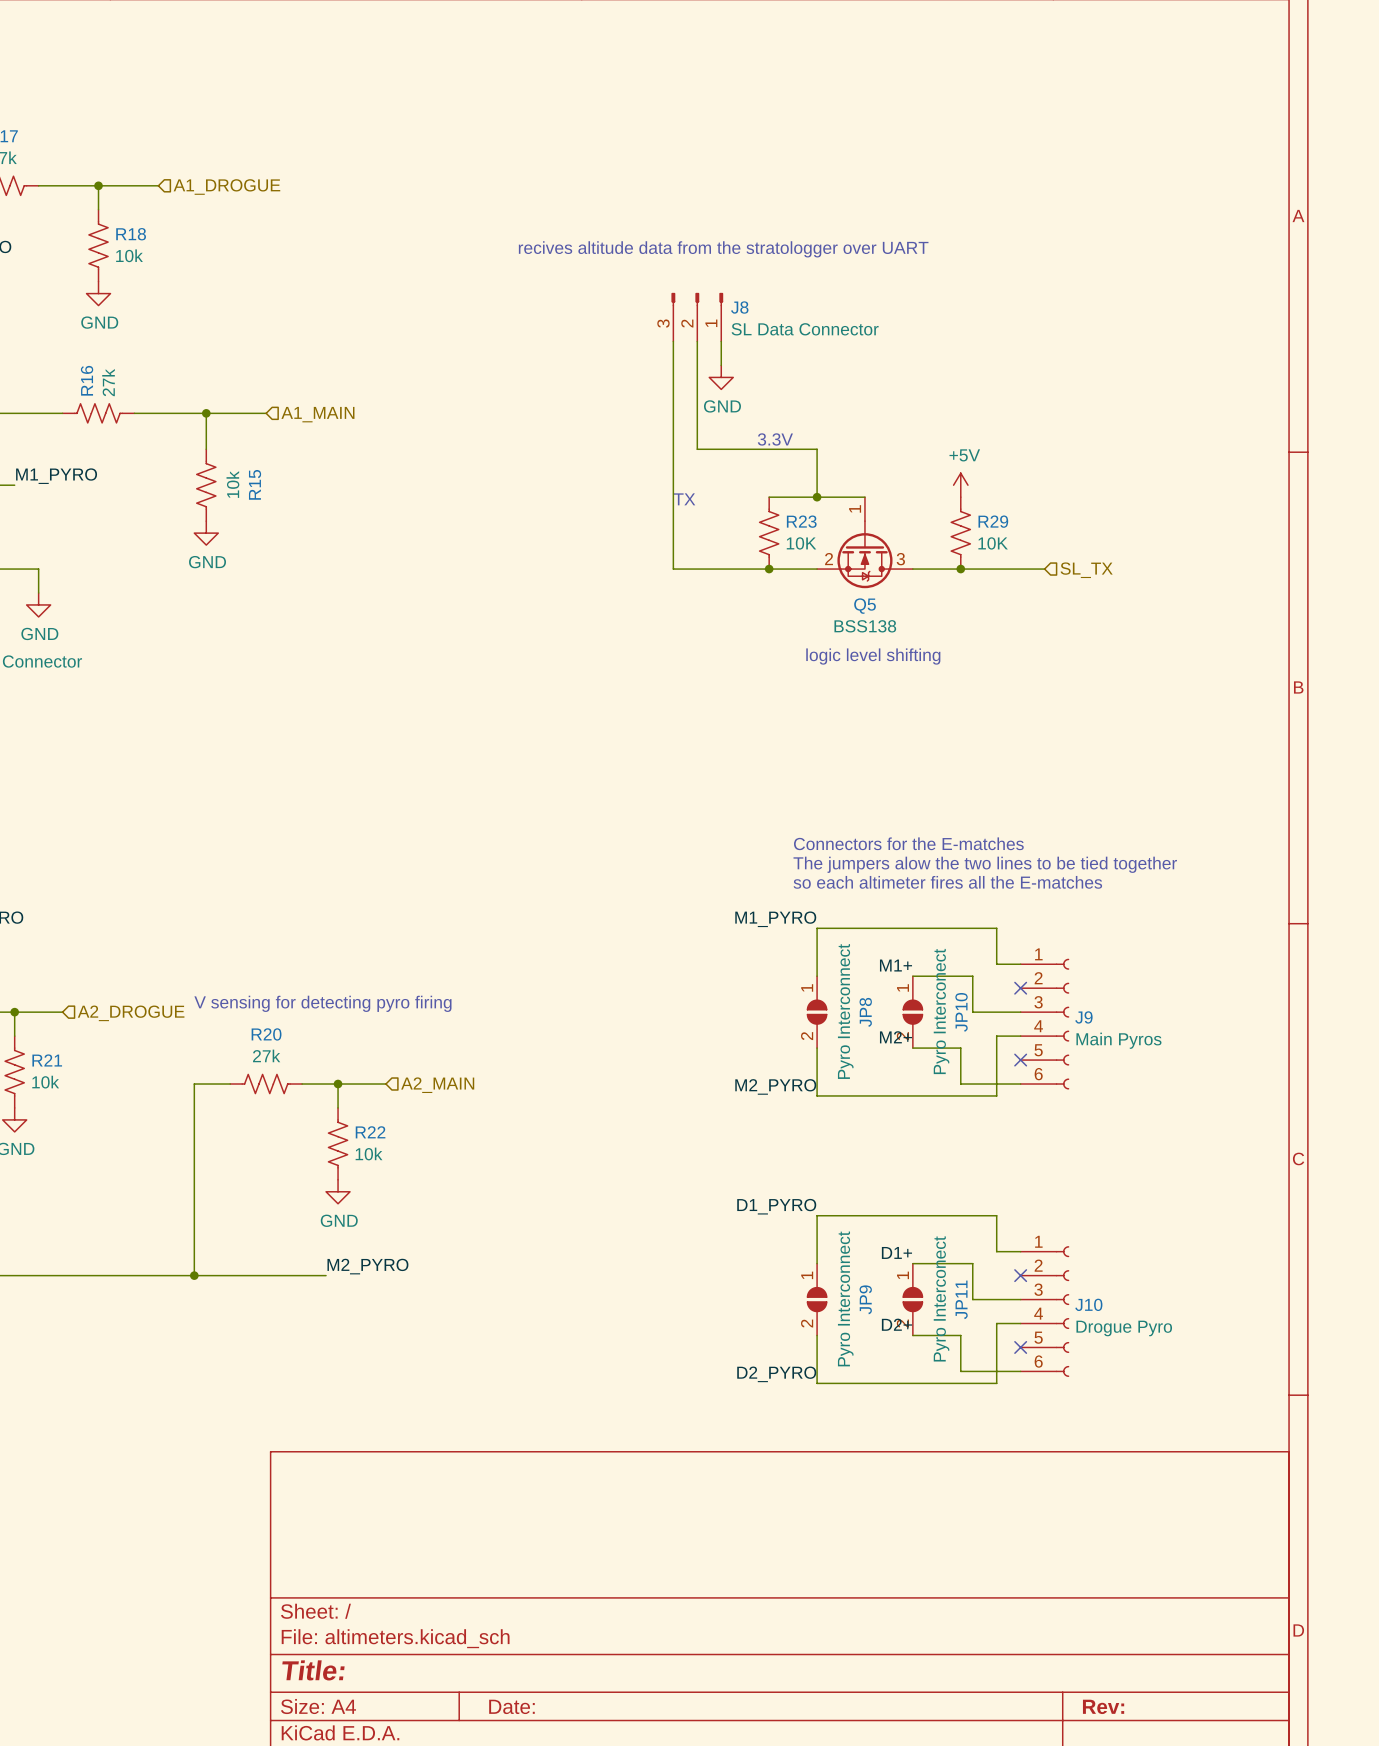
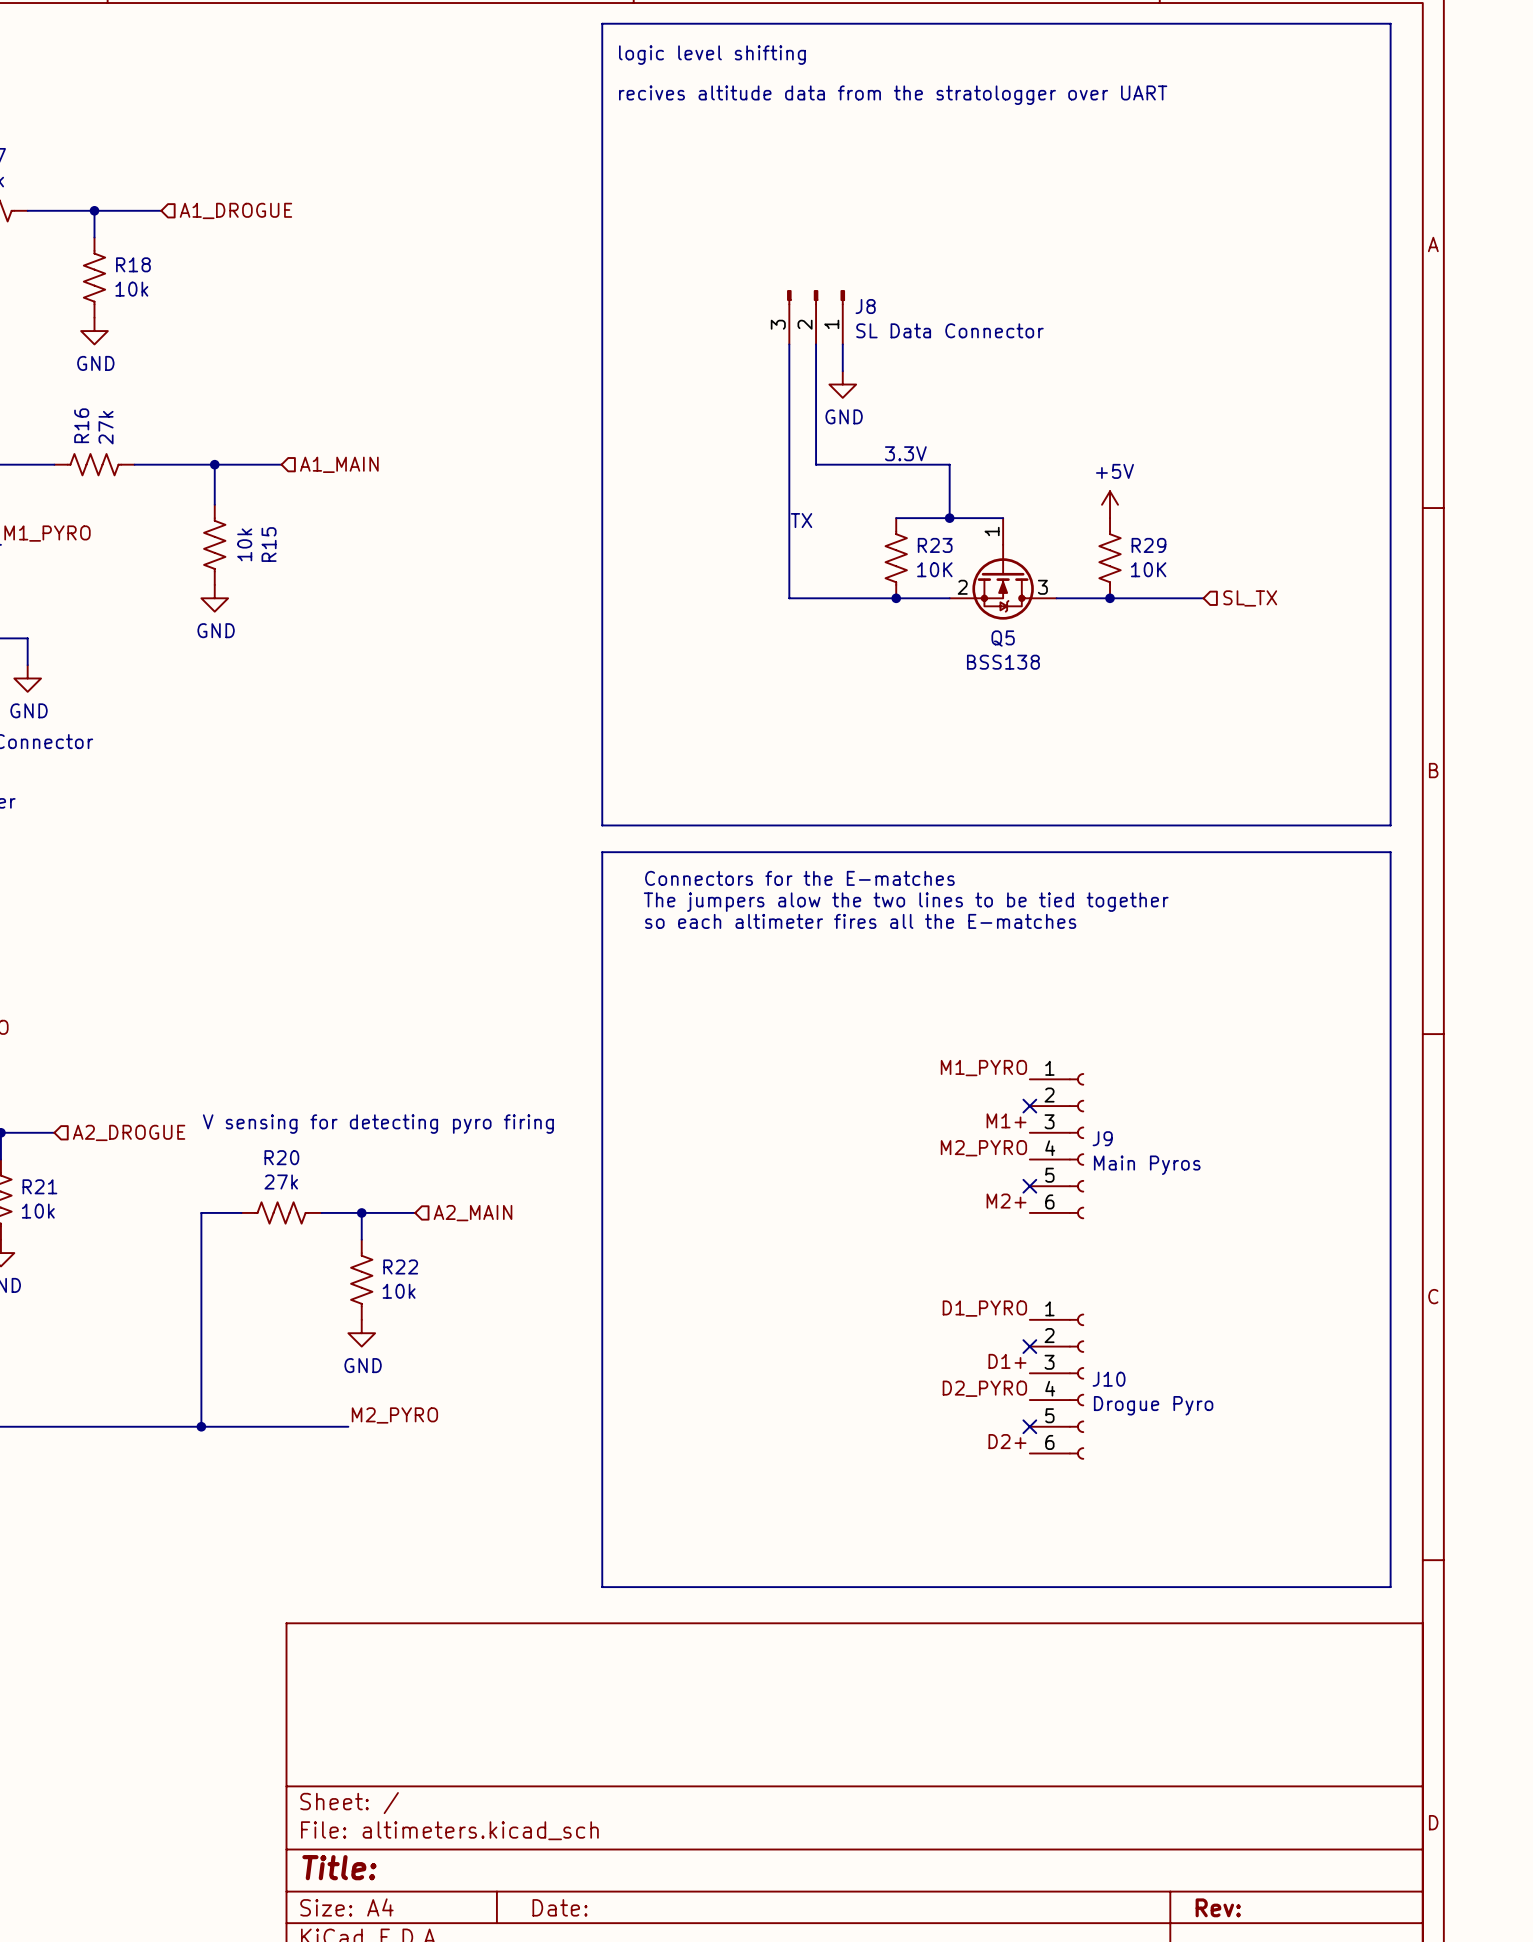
line: none -> (602, 23) (1390, 23) (1390, 825) (602, 825) (602, 23)
text: none -> logic level shifting (712, 55)
text position: recives altitude data from the stratologger over UART (723, 249) -> recives altitude data from the stratologger over UART (893, 95)
wire: none -> (842, 344) (842, 371)
J8 position: (697, 317) -> (816, 317)
wire: (673, 341) (673, 569) (817, 569) -> none
wire: (697, 341) (697, 449) (817, 449) (817, 497) -> (816, 344) (816, 464) (949, 464) (949, 518)
wire: none -> (789, 411) (789, 598) (949, 598)
power symbol position: GND (721, 377) -> GND (842, 384)
text position: 3.3V (775, 439) -> 3.3V (905, 453)
junction: none -> (949, 518)
power symbol position: +5V (960, 485) -> +5V (1110, 504)
wire: (769, 497) (864, 497) -> (896, 518) (1003, 518)
junction: (817, 497) -> none
text position: TX (684, 499) -> TX (801, 520)
R23 position: (769, 533) -> (896, 558)
junction: none -> (896, 598)
R29 position: (960, 533) -> (1110, 558)
junction: none -> (1110, 598)
Q5 position: (864, 542) -> (1003, 568)
junction: (769, 569) -> none
wire: (912, 569) (1044, 569) -> (1056, 598) (1203, 598)
junction: (960, 569) -> none
hierarchical label position: SL_TX (1086, 570) -> SL_TX (1250, 598)
text: logic level shifting (873, 656) -> none
line: none -> (602, 852) (602, 1587) (1390, 1587) (1390, 852) (602, 852)
text position: Connectors for the E-matches (908, 843) -> Connectors for the E-matches (799, 878)
text position: The jumpers alow the two lines to be tied together (985, 864) -> The jumpers alow the two lines to be tied together (906, 902)
text position: so each altimeter fires all the E-matches (947, 882) -> so each altimeter fires all the E-matches (860, 921)
label position: M1_PYRO (775, 919) -> M1_PYRO (983, 1068)
wire: (1020, 964) (996, 964) (996, 928) (817, 928) (817, 976) -> none
label position: M1+ (895, 965) -> M1+ (1006, 1120)
wire: (912, 976) (972, 976) (972, 1012) (1020, 1012) -> none
no-connect mark: none -> (1029, 1106)
no-connect mark: (1020, 988) -> none
JP8: Pyro Interconnect (817, 1012) -> none
JP10: Pyro Interconect (912, 1012) -> none
J9 position: (1044, 1024) -> (1056, 1146)
wire: (1020, 1036) (996, 1036) (996, 1095) (817, 1095) (817, 1048) -> none
label position: M2+ (895, 1037) -> M2+ (1006, 1201)
wire: (912, 1048) (960, 1048) (960, 1084) (1020, 1084) -> none
no-connect mark: none -> (1029, 1186)
no-connect mark: (1020, 1060) -> none
label position: M2_PYRO (775, 1086) -> M2_PYRO (983, 1148)
no-connect mark: none -> (1029, 1346)
label position: D1_PYRO (776, 1206) -> D1_PYRO (984, 1308)
wire: (1020, 1251) (996, 1251) (996, 1215) (817, 1215) (817, 1263) -> none
label position: D1+ (896, 1252) -> D1+ (1007, 1361)
wire: (912, 1263) (972, 1263) (972, 1299) (1020, 1299) -> none
no-connect mark: none -> (1029, 1426)
no-connect mark: (1020, 1275) -> none
JP9: Pyro Interconnect (817, 1299) -> none
JP11: Pyro Interconect (912, 1299) -> none
J10 position: (1044, 1311) -> (1056, 1386)
wire: (1020, 1323) (996, 1323) (996, 1383) (817, 1383) (817, 1335) -> none
label position: D2+ (896, 1324) -> D2+ (1007, 1441)
wire: (912, 1335) (960, 1335) (960, 1371) (1020, 1371) -> none
no-connect mark: (1020, 1347) -> none
label position: D2_PYRO (776, 1374) -> D2_PYRO (984, 1388)

